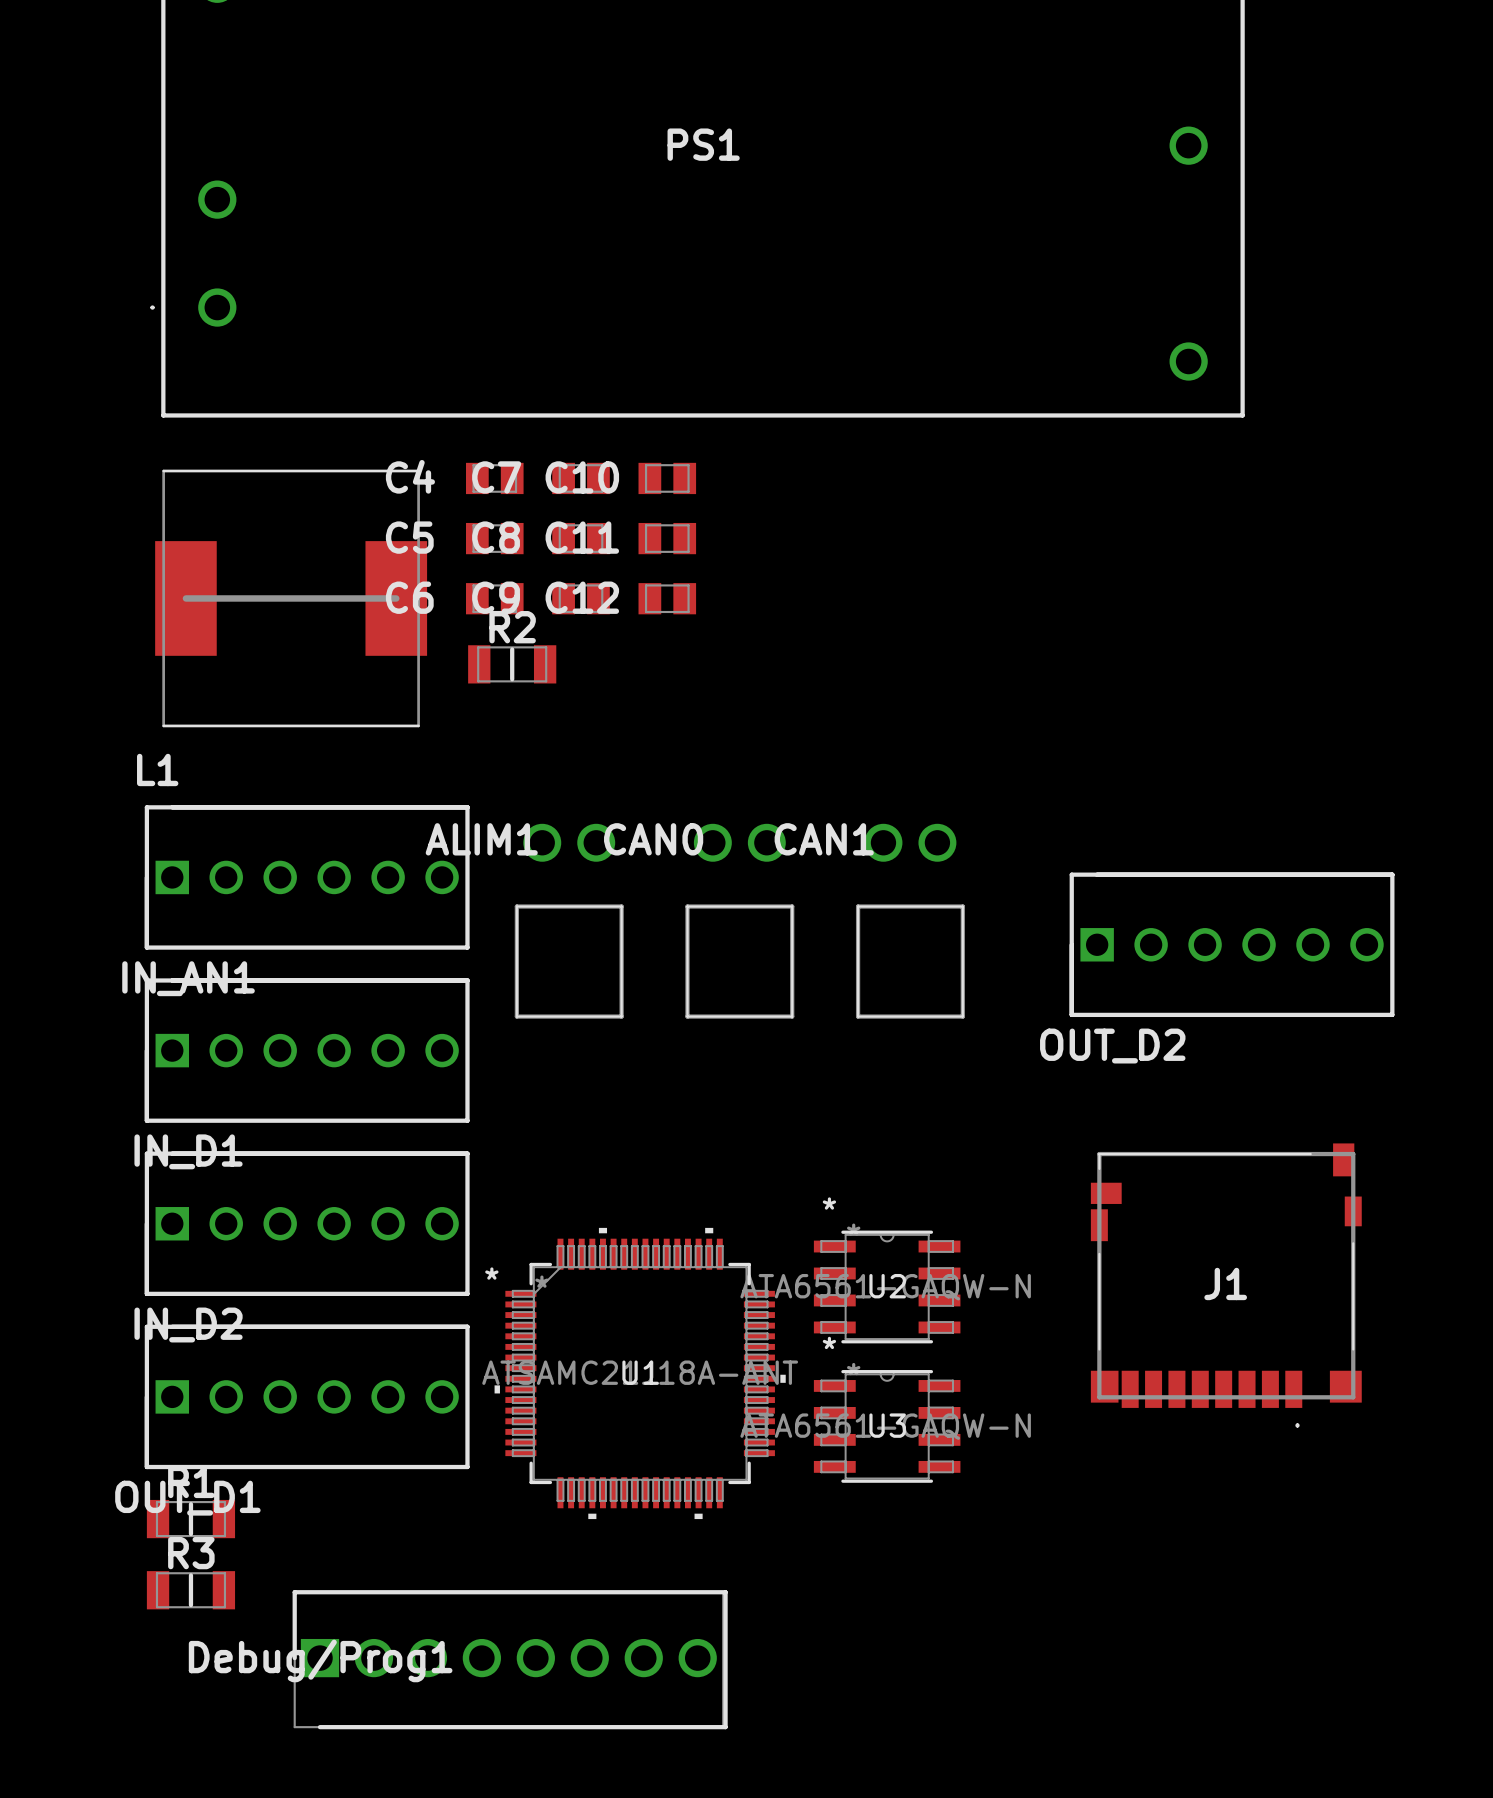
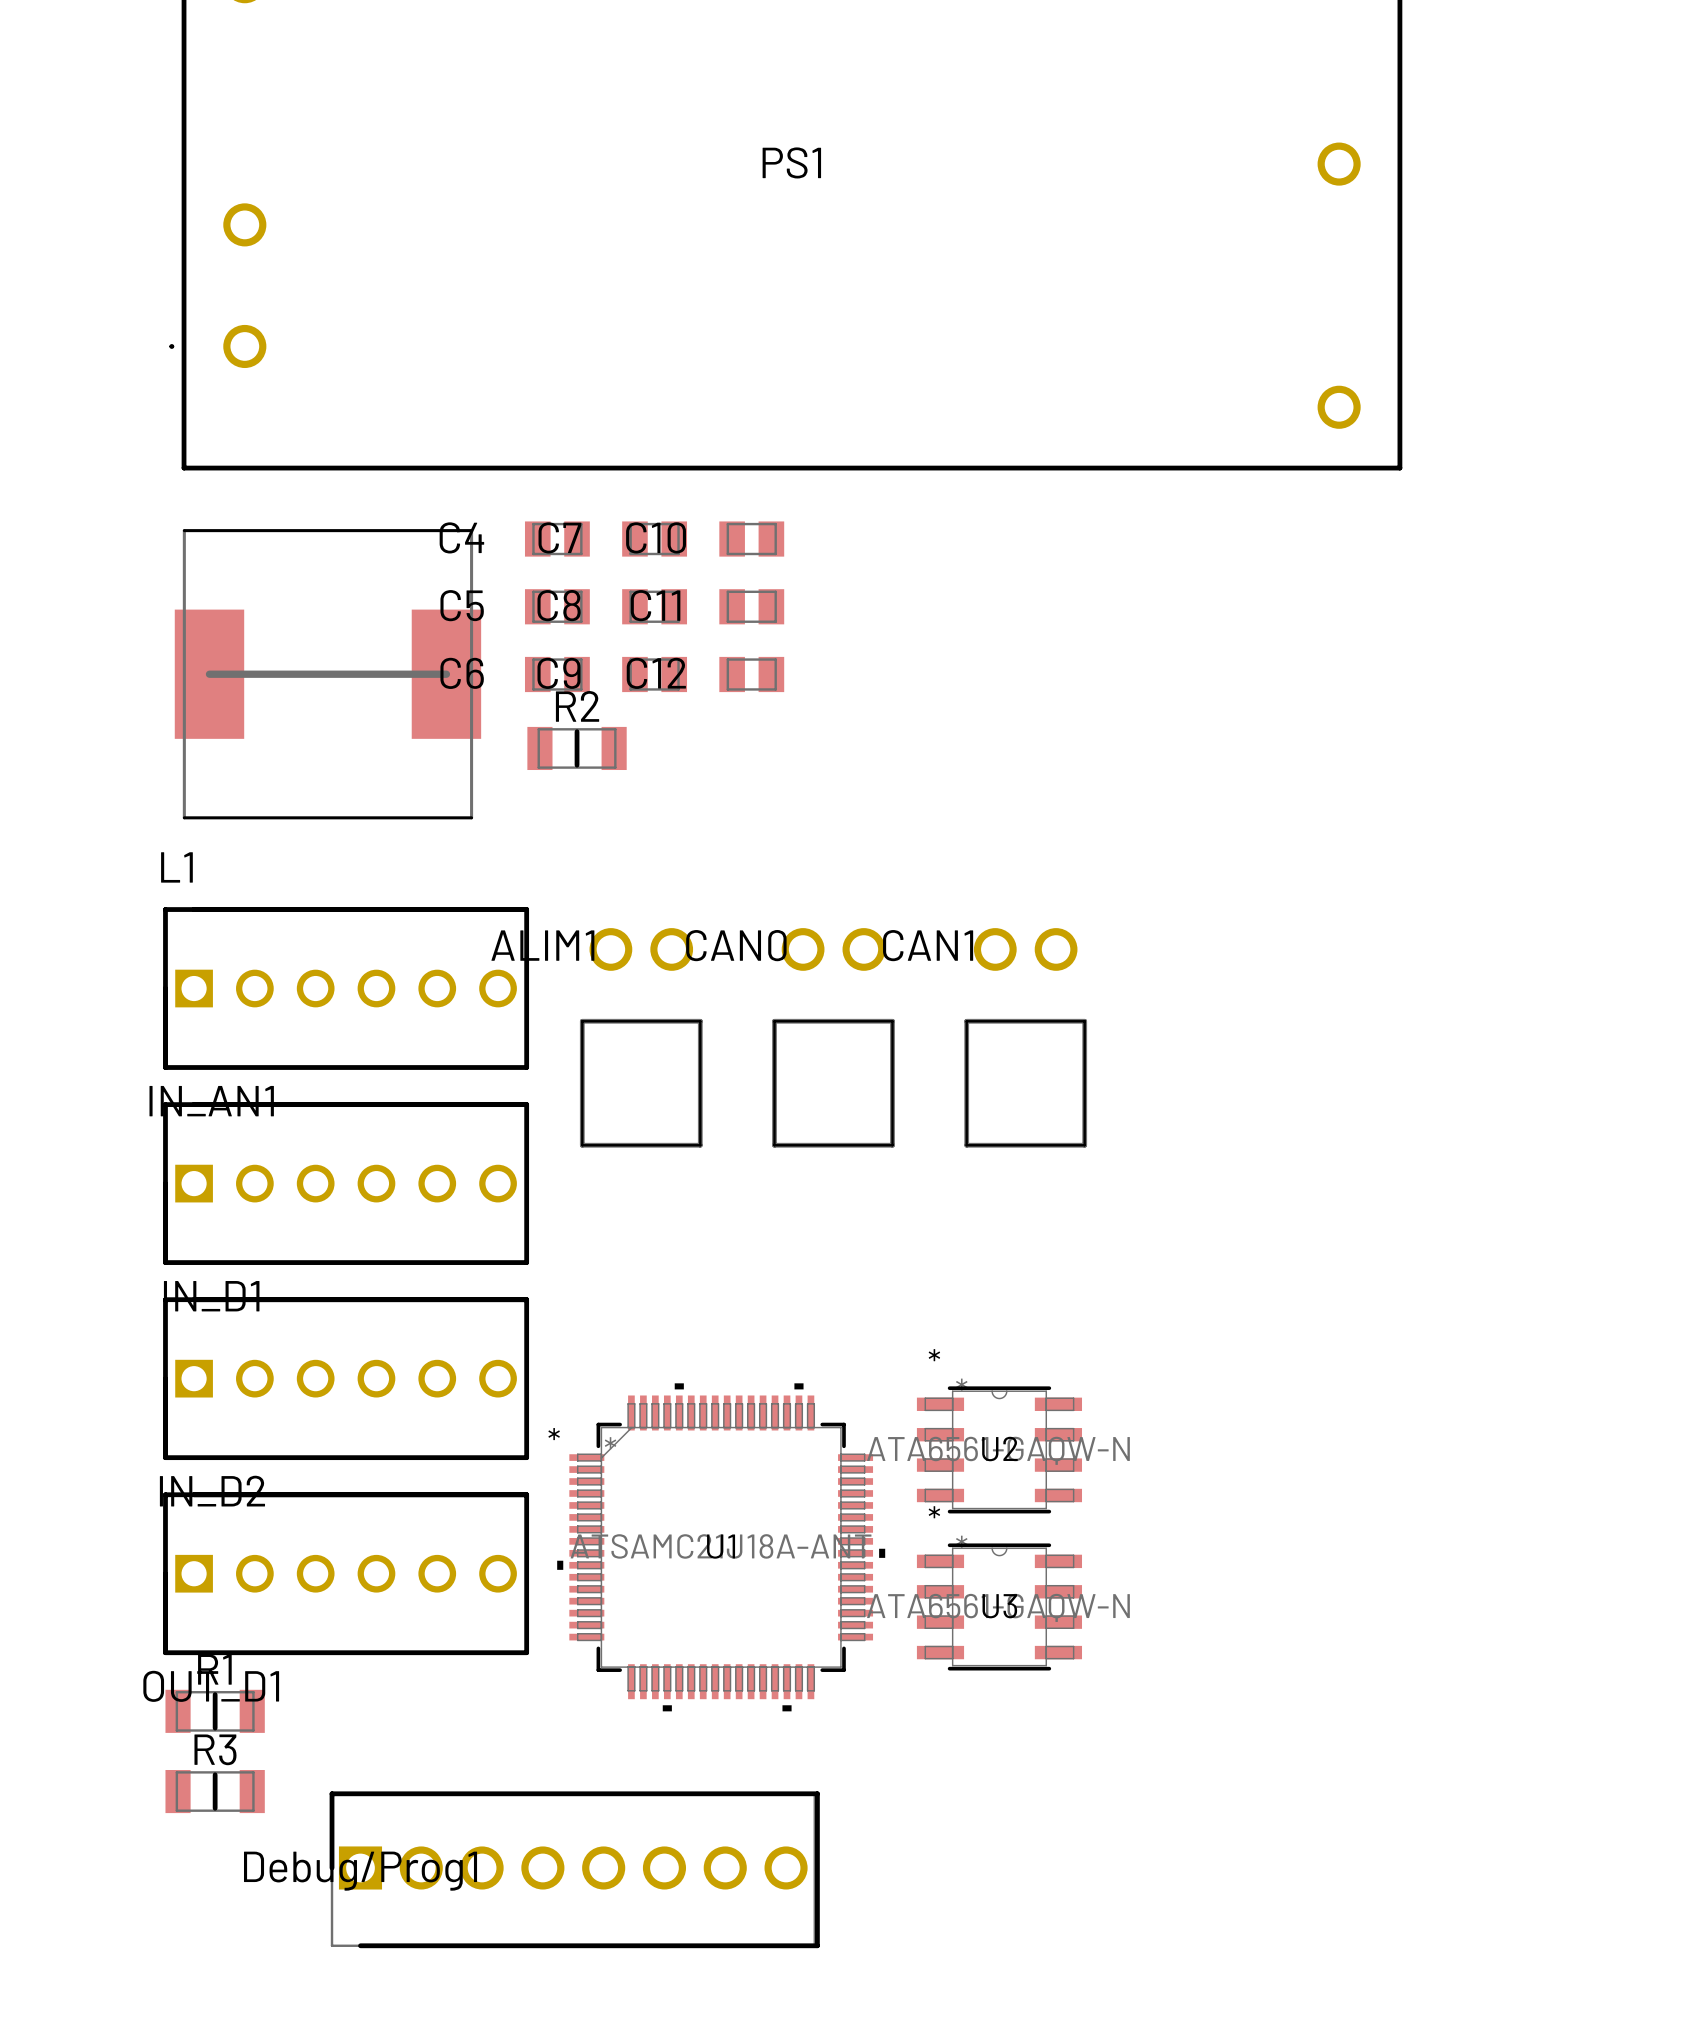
OUT_D2: (1232, 944) -> none
J1: (1226, 1285) -> none

